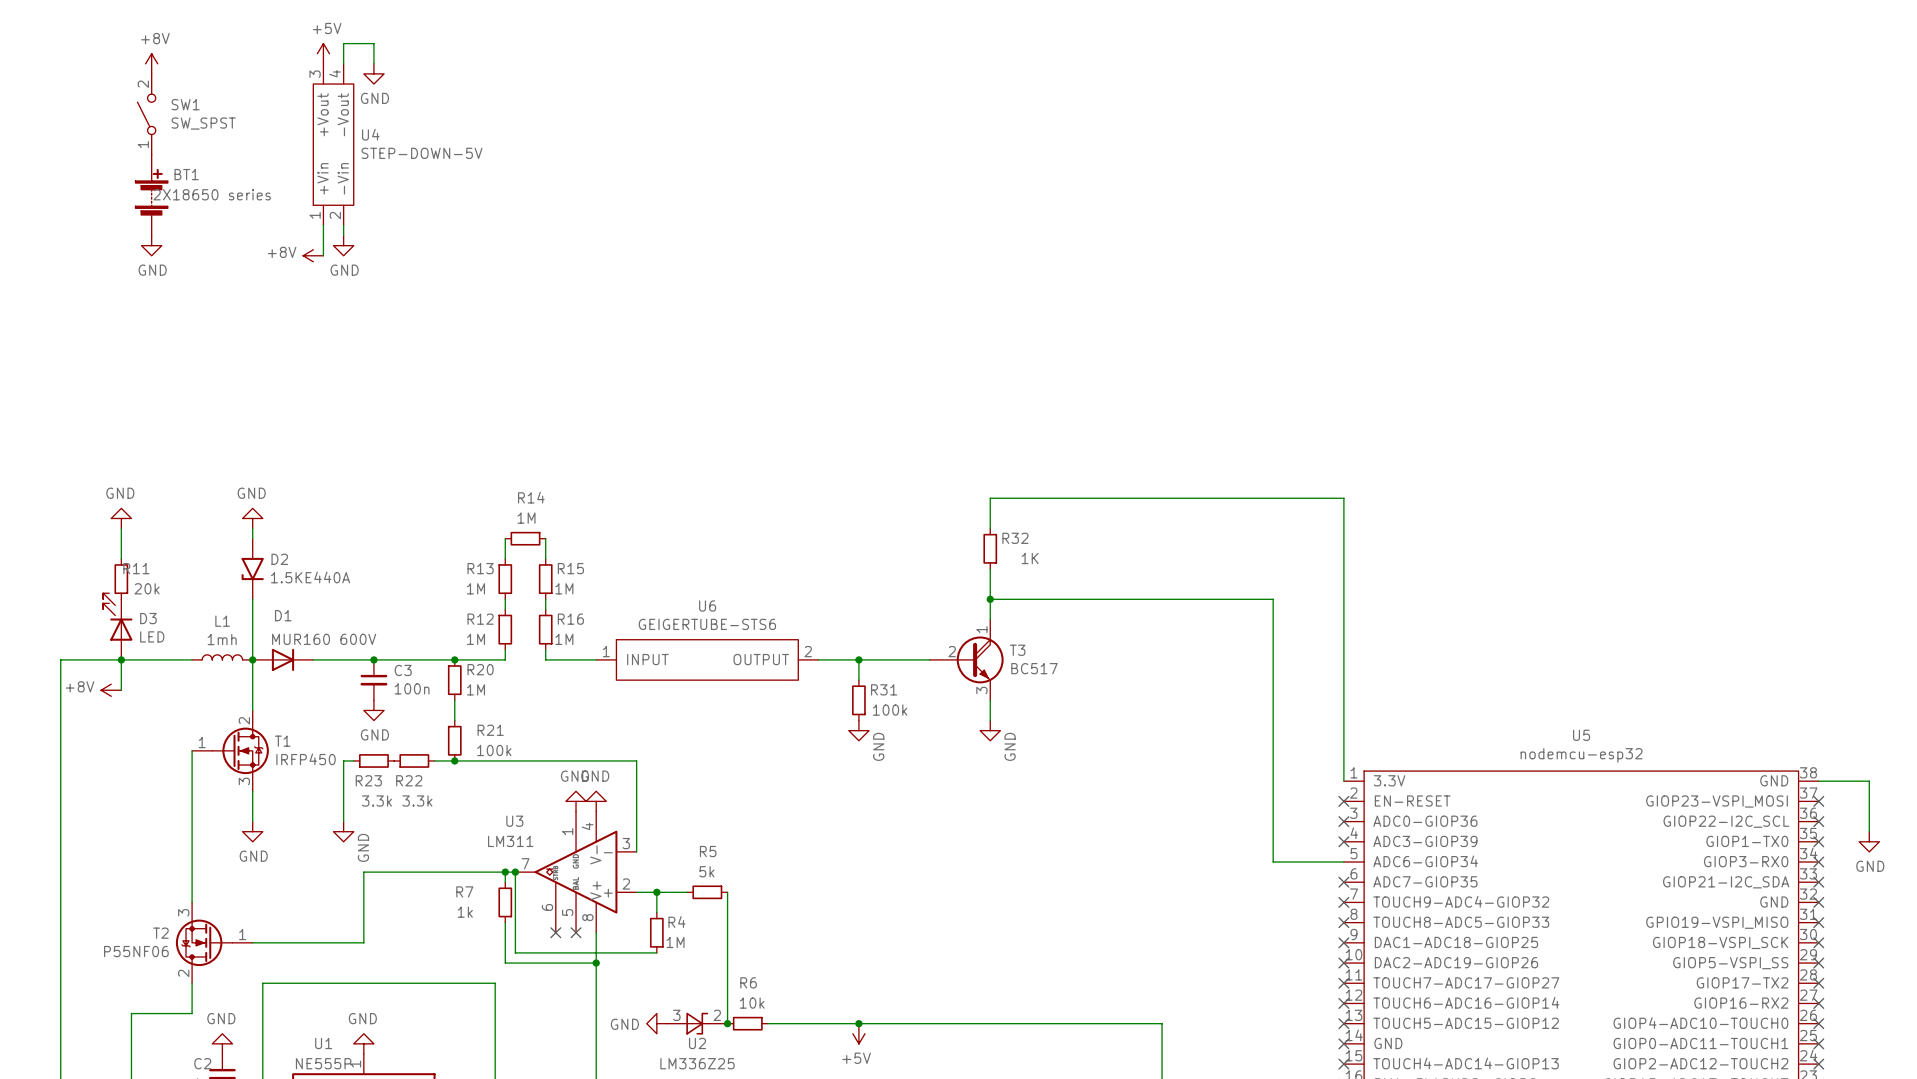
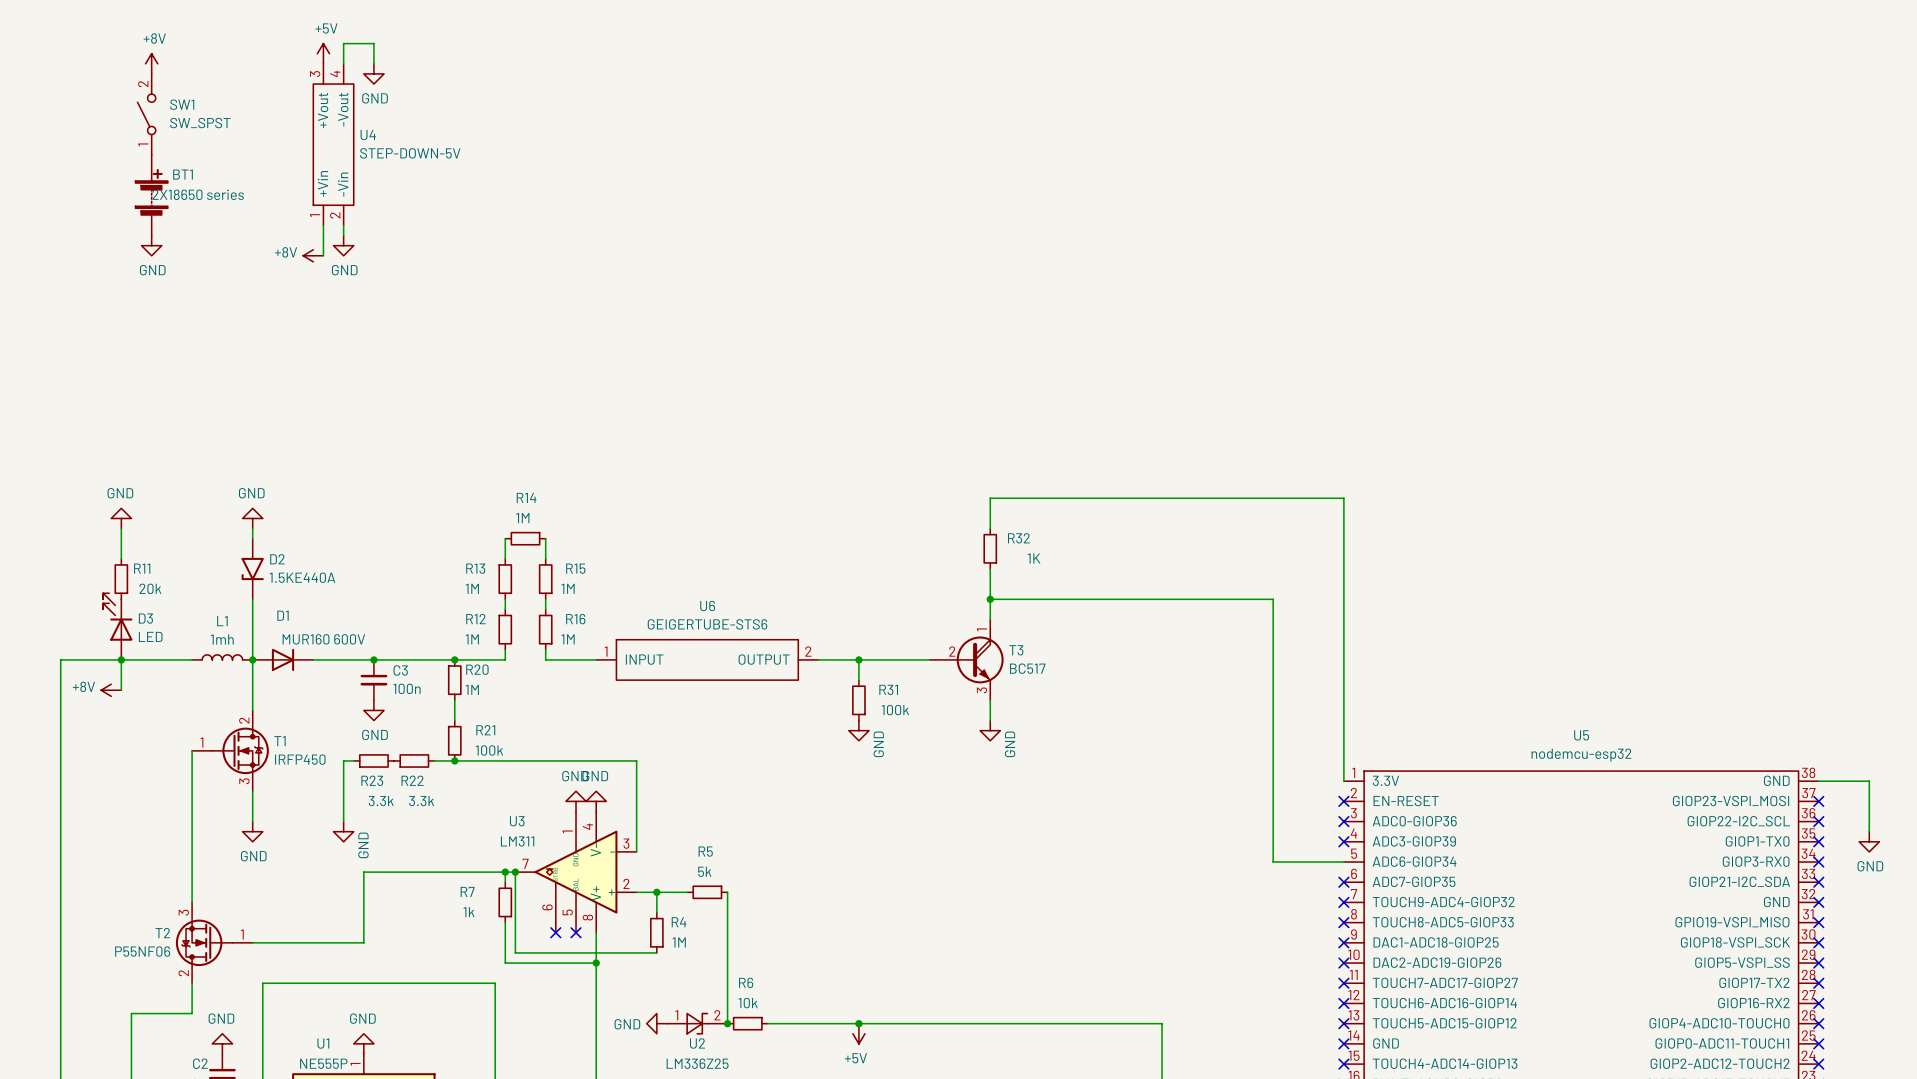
U2 pin number: 3 (676, 1015) -> 1 (676, 1015)

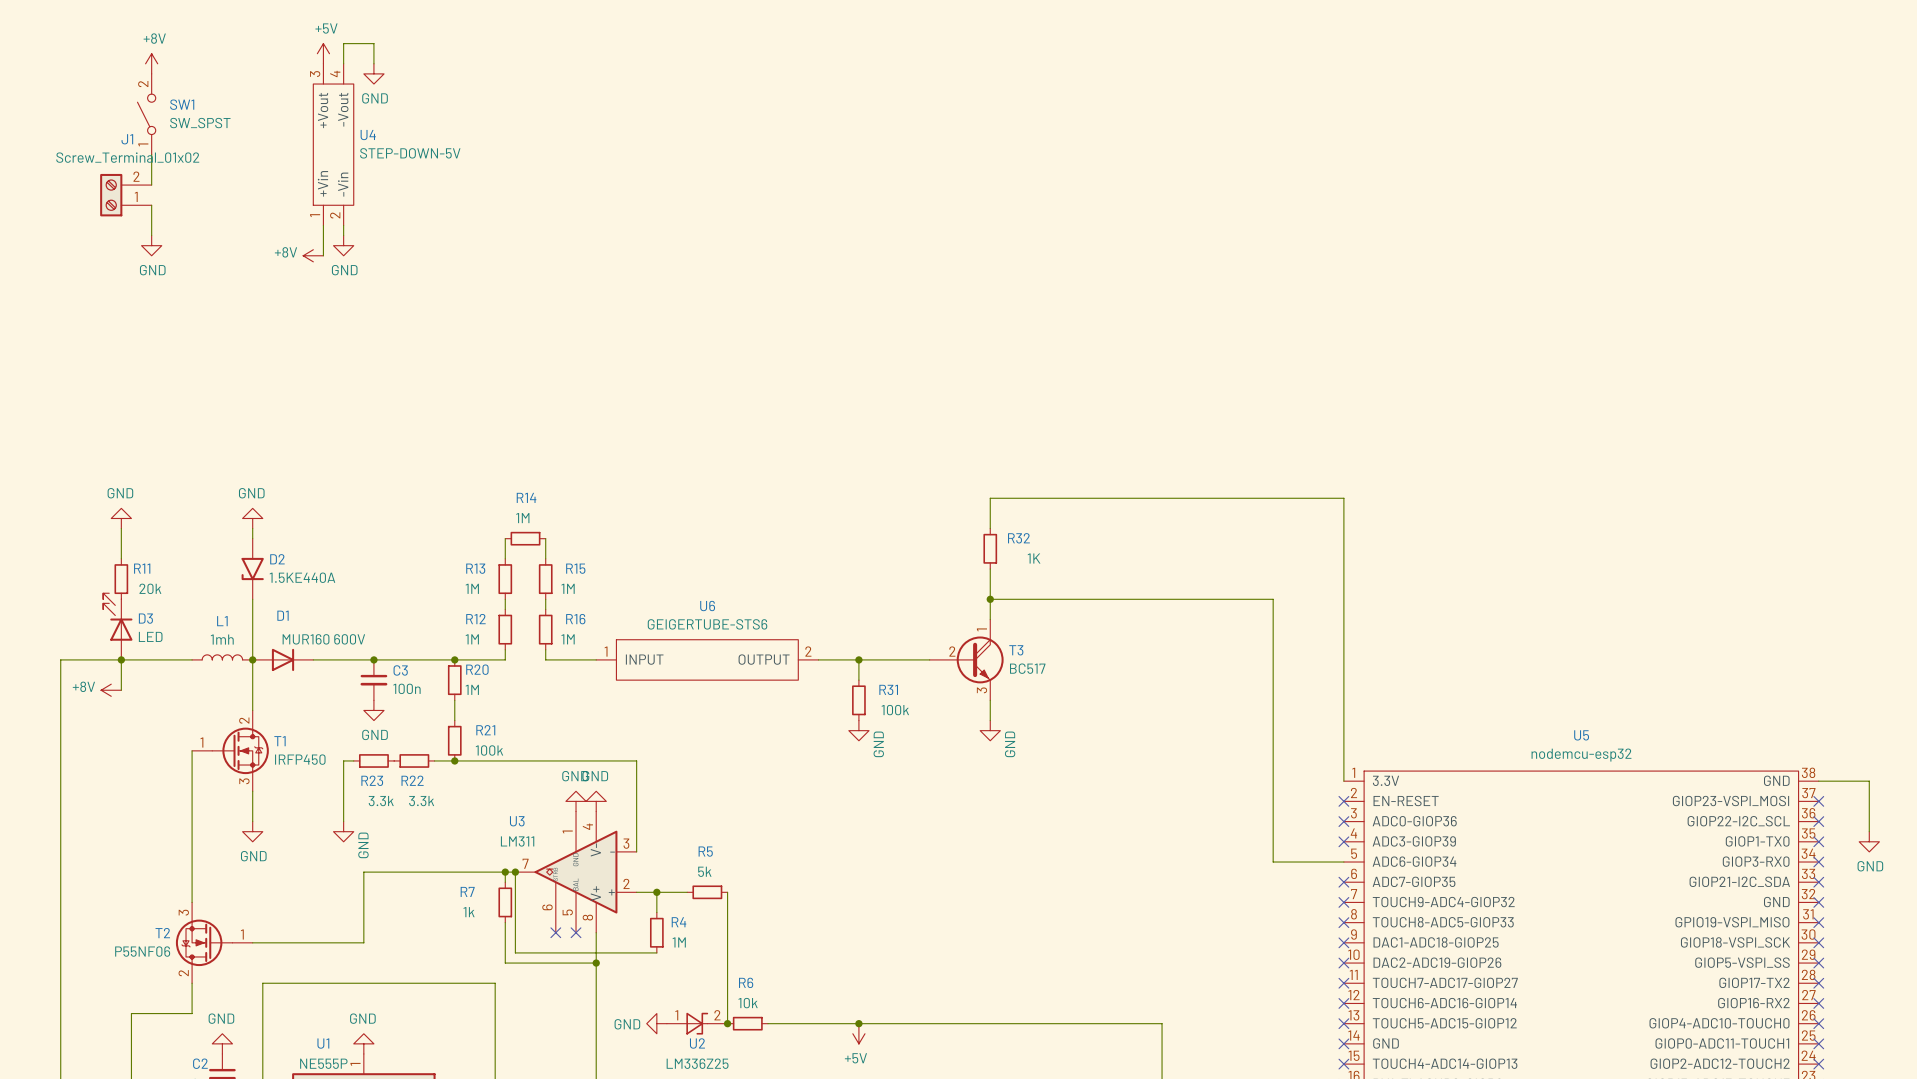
J1: none -> Screw_Terminal_01x02 (125, 195)
BT1: 2X18650 series (151, 195) -> none

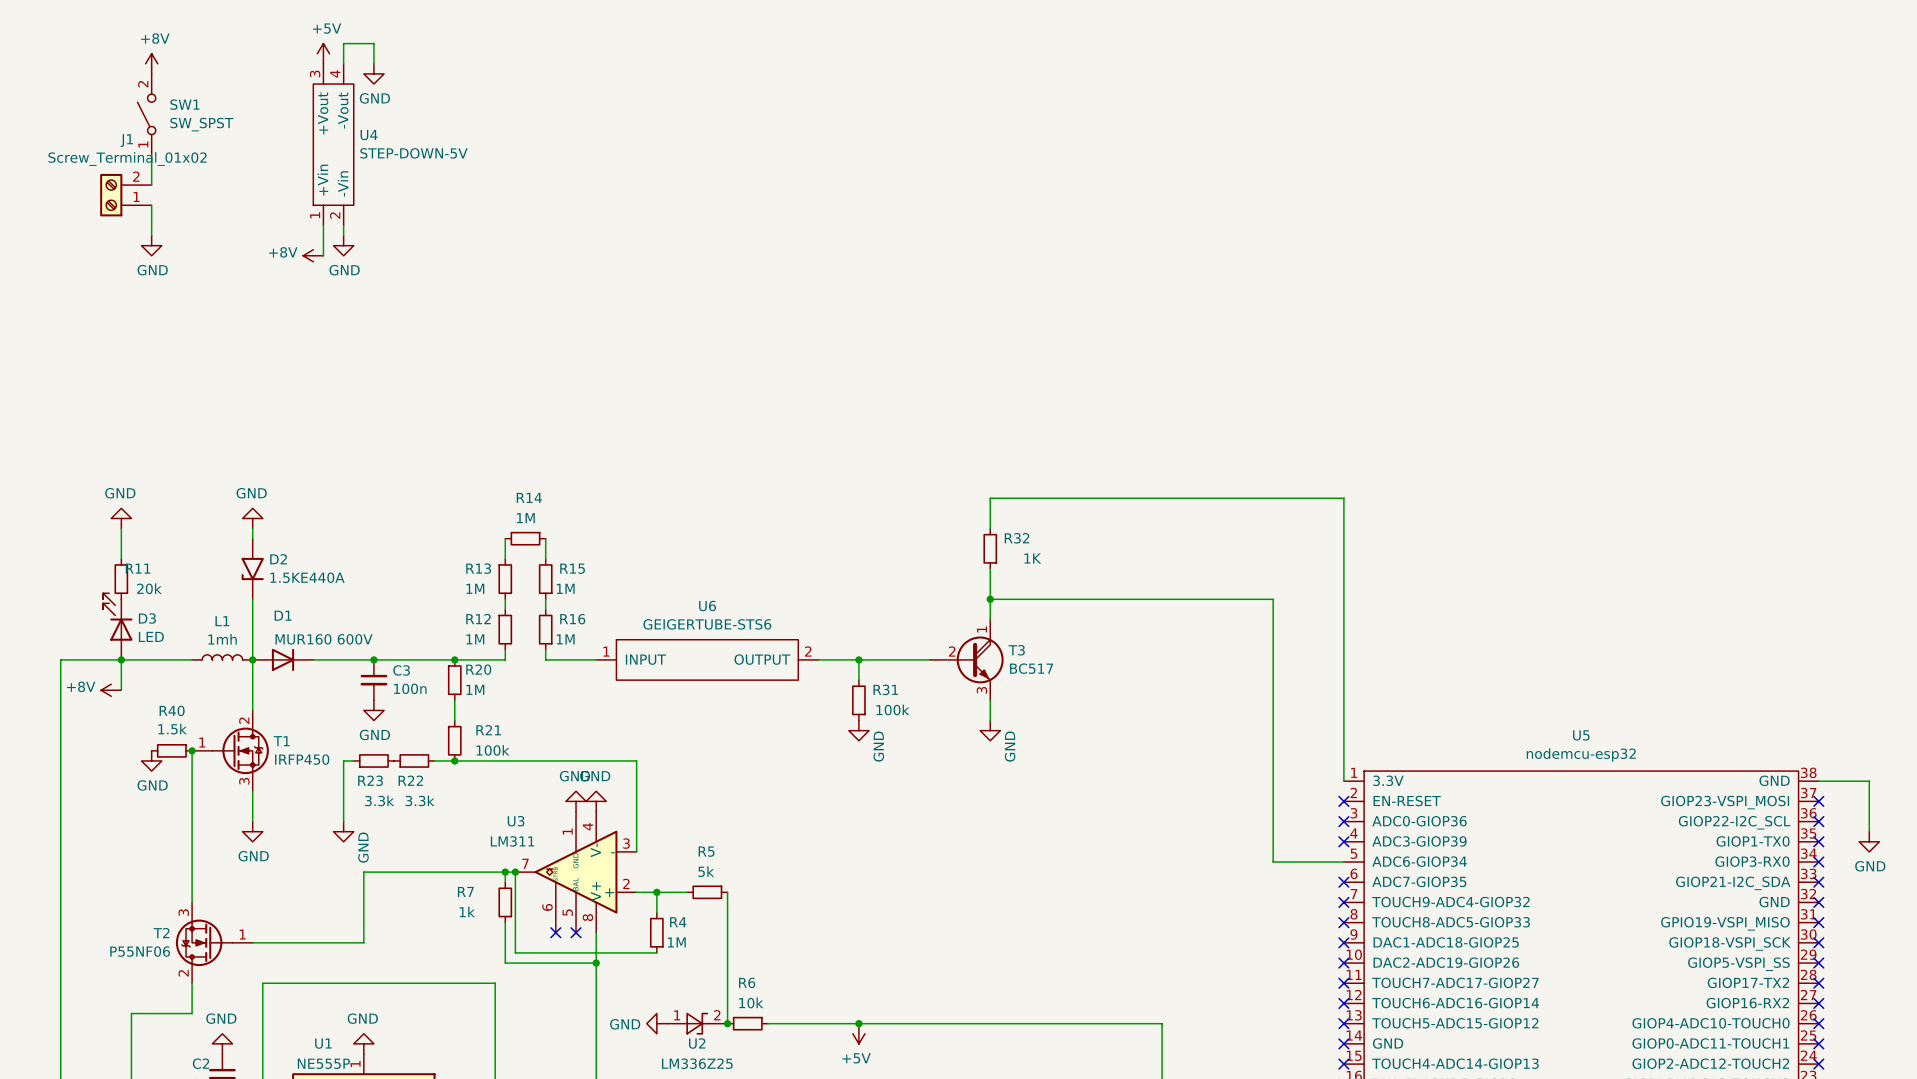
R40: none -> 1.5k (171, 750)
junction: none -> (192, 750)
power symbol: none -> GND (151, 760)

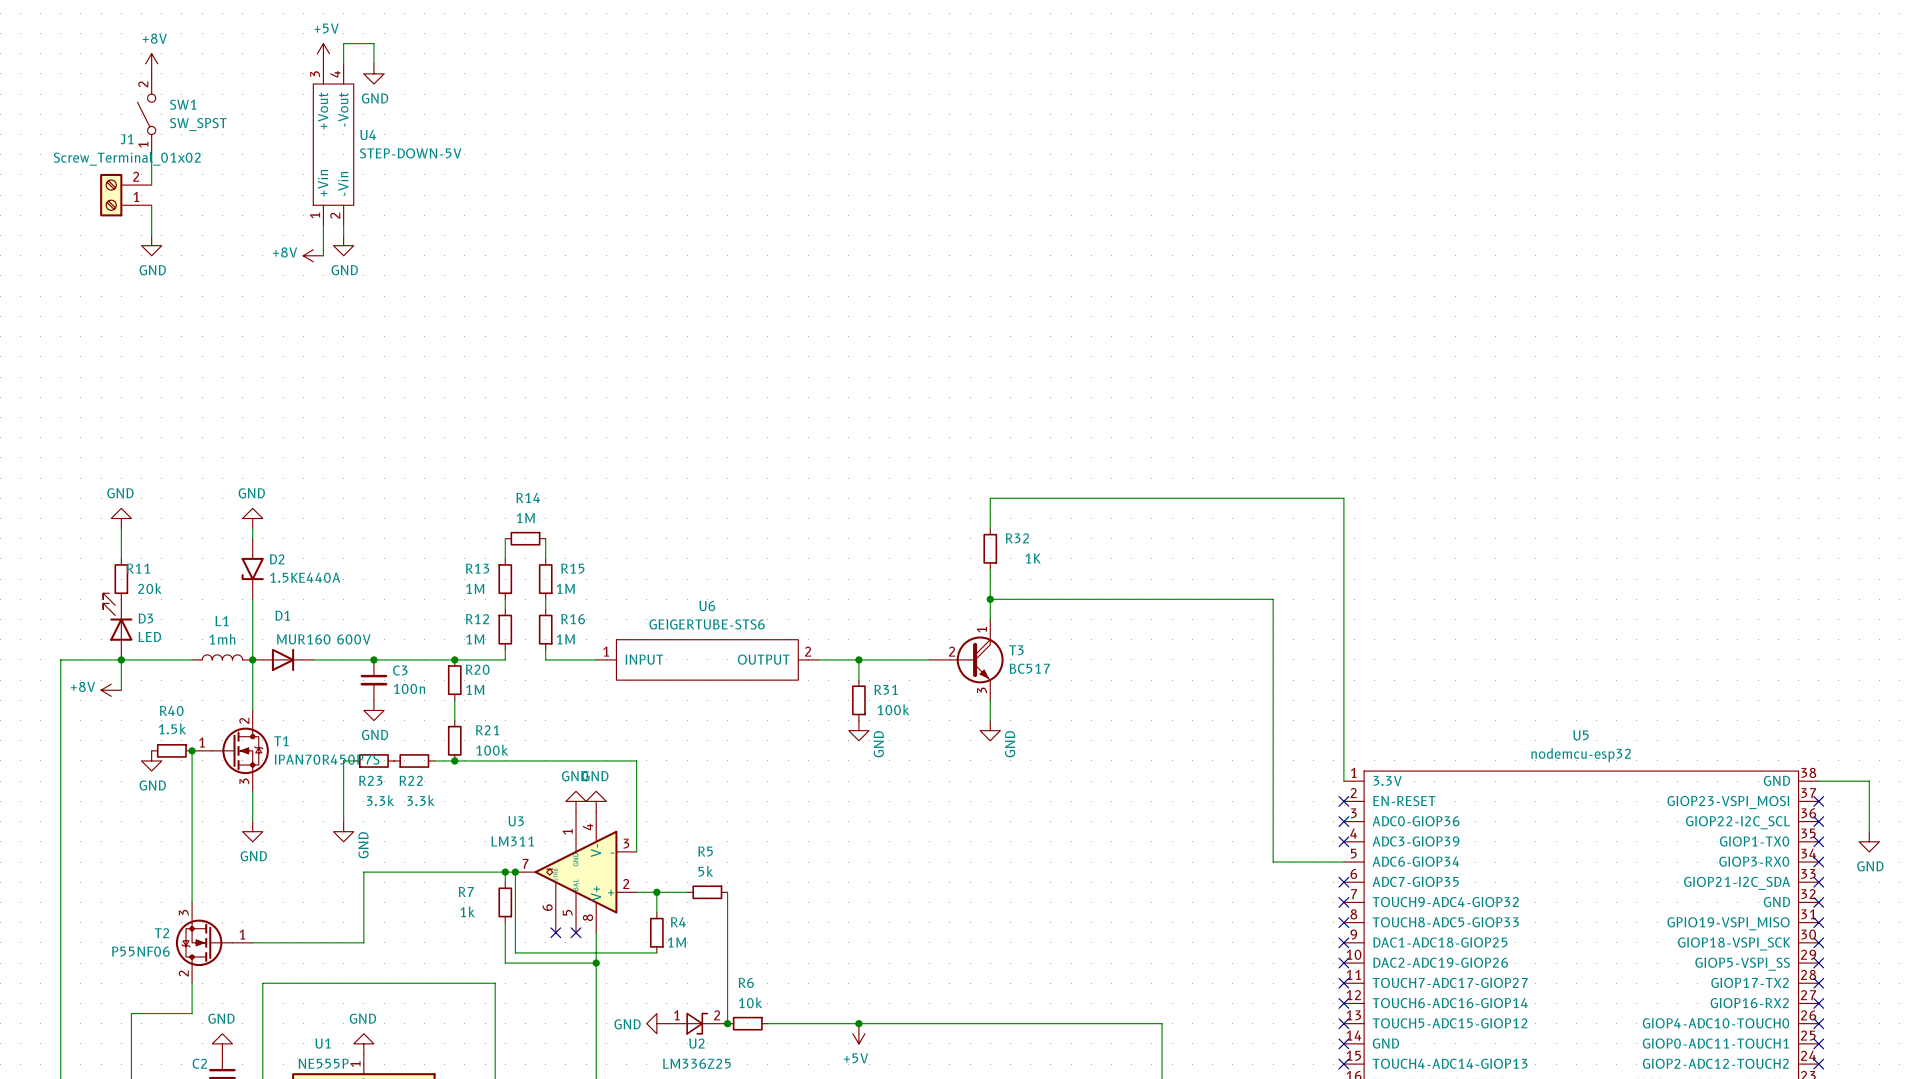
T1 value: IRFP450 (302, 759) -> IPAN70R450P7S (327, 759)

